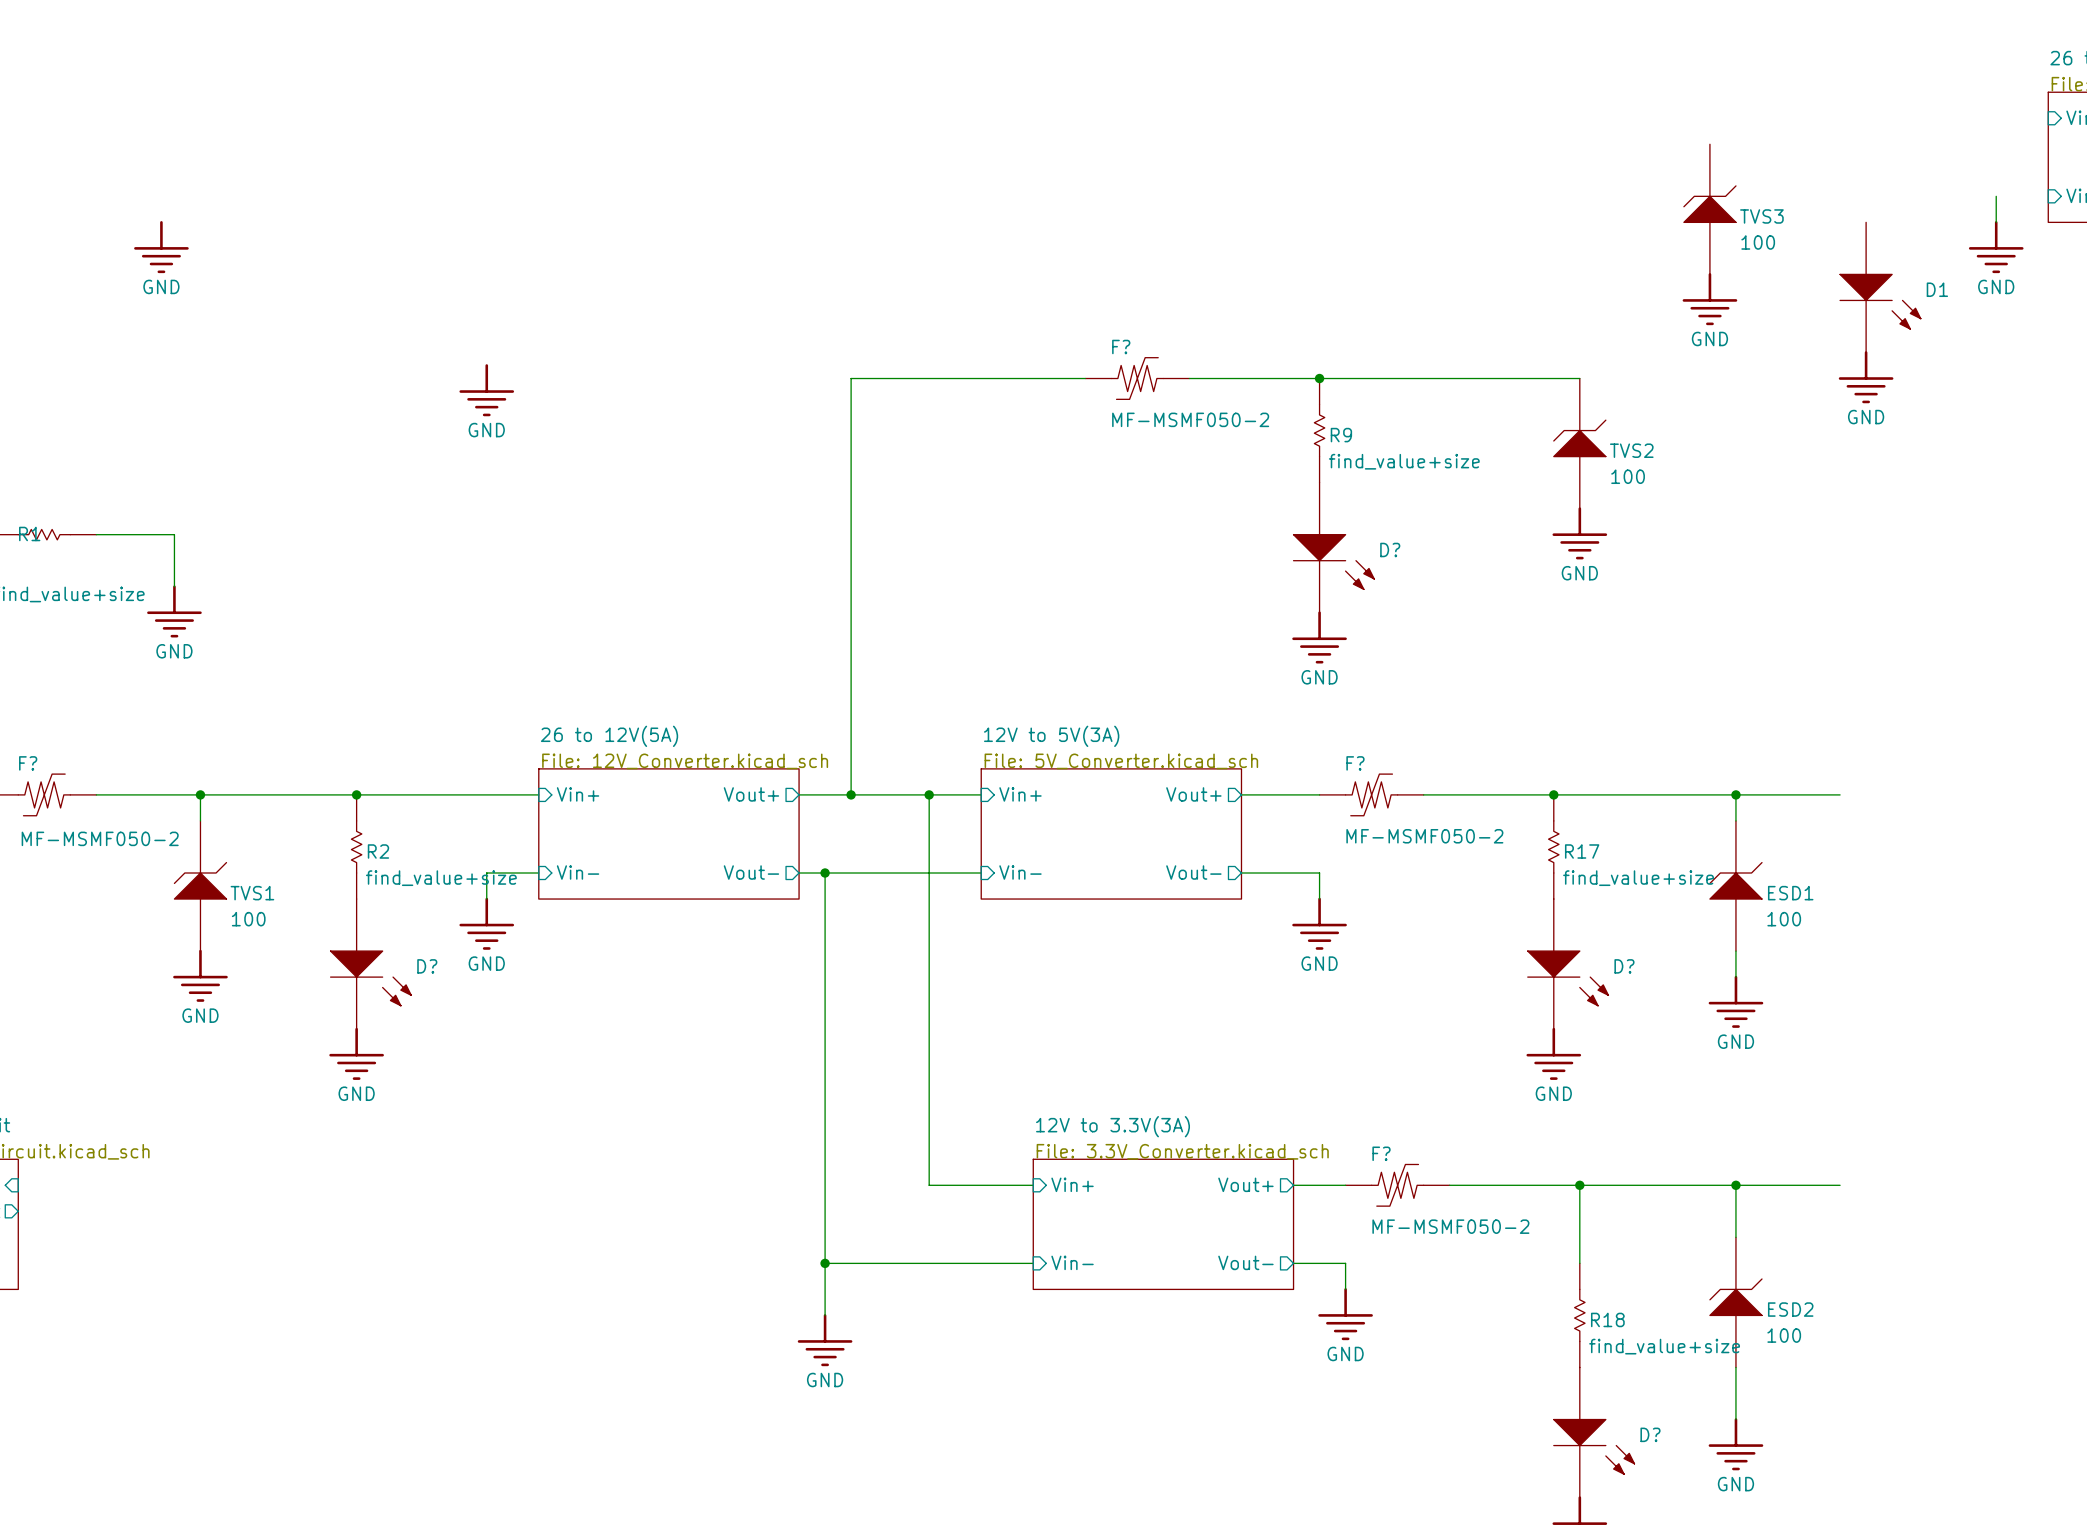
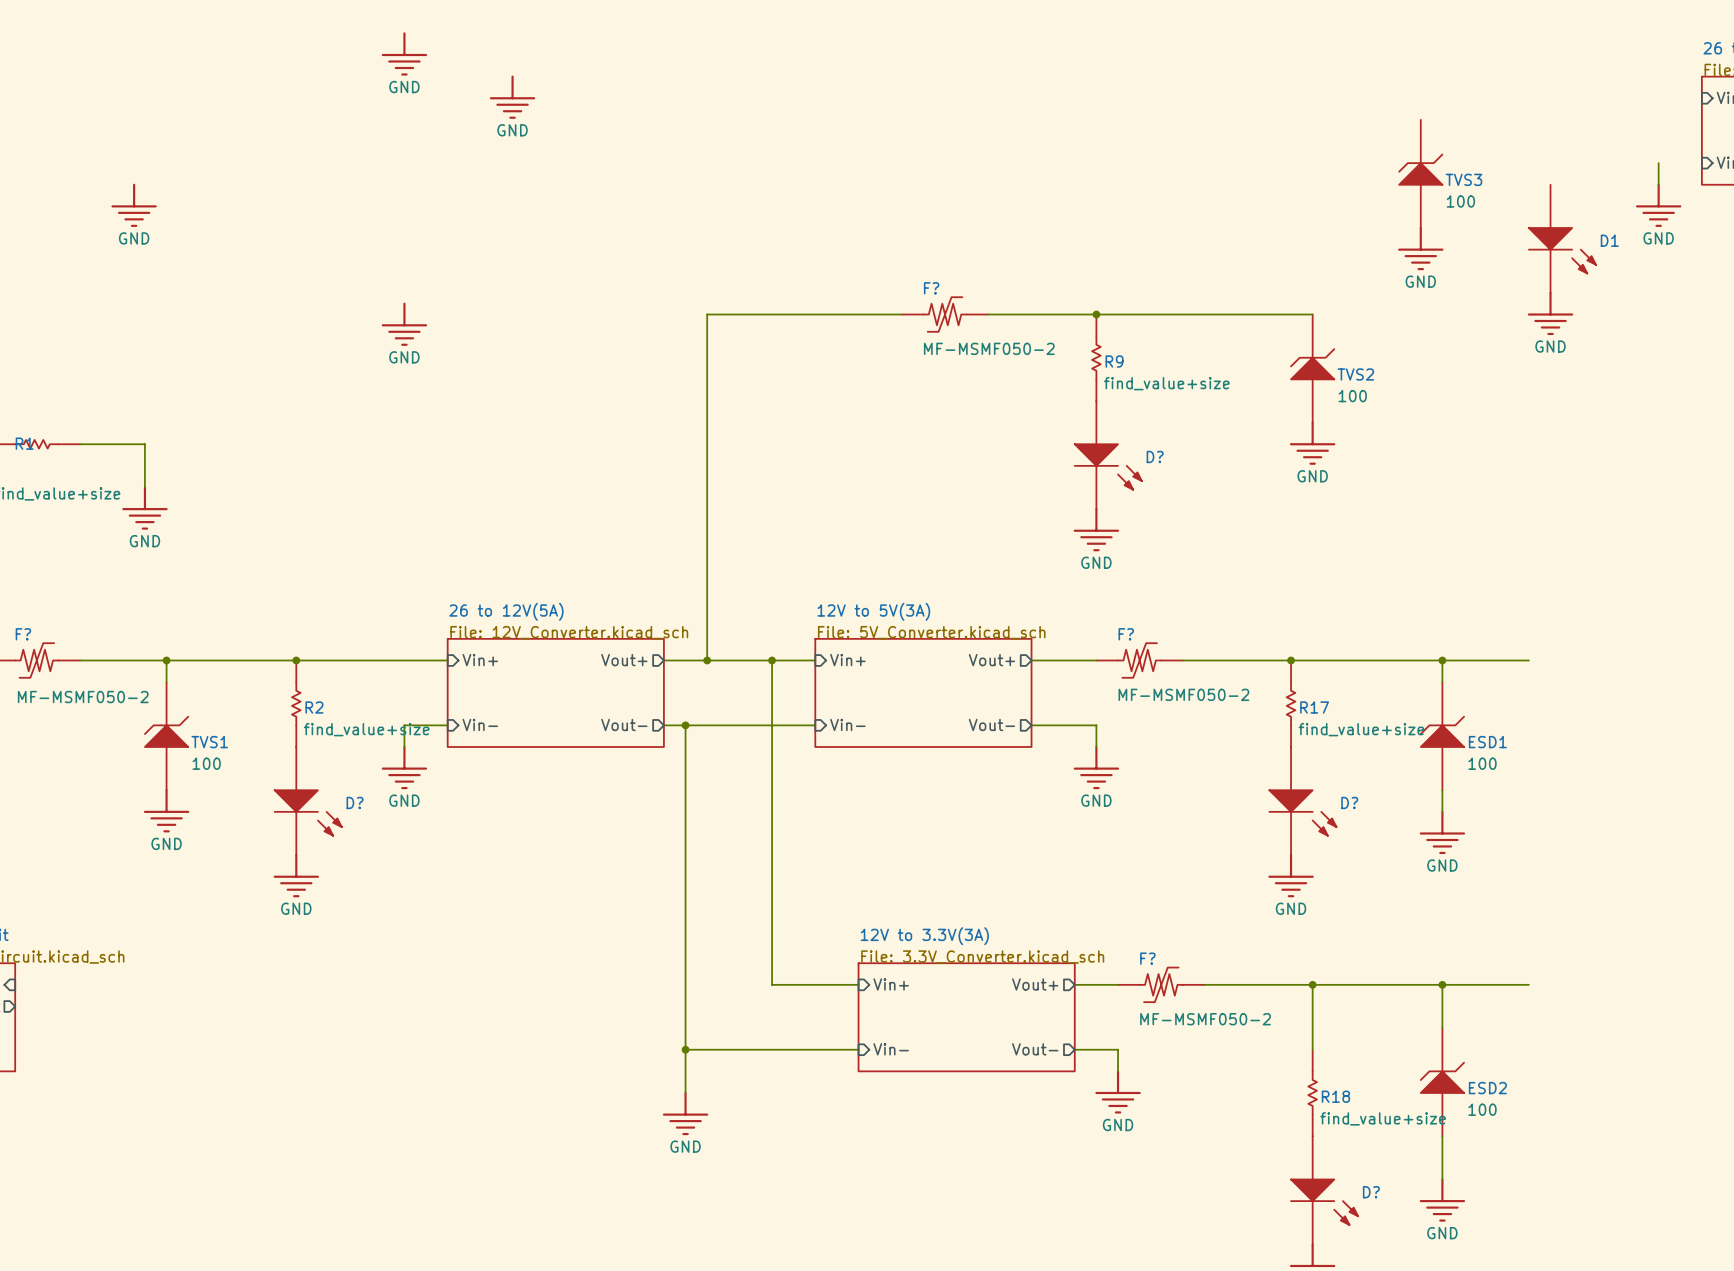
power symbol: none -> GND (404, 53)
power symbol: none -> GND (512, 97)

